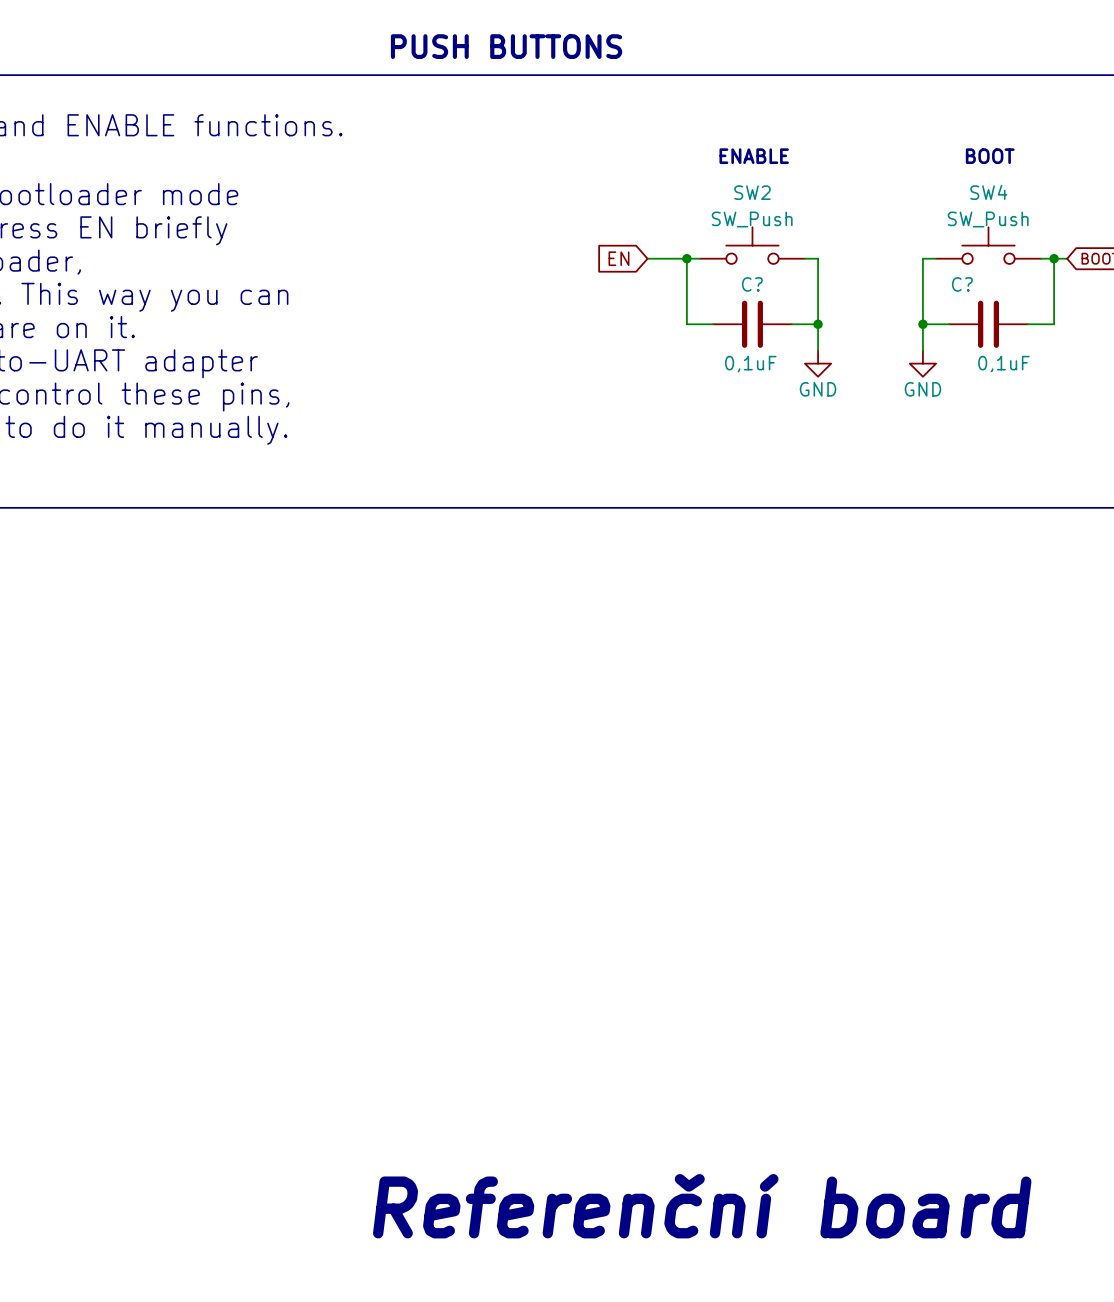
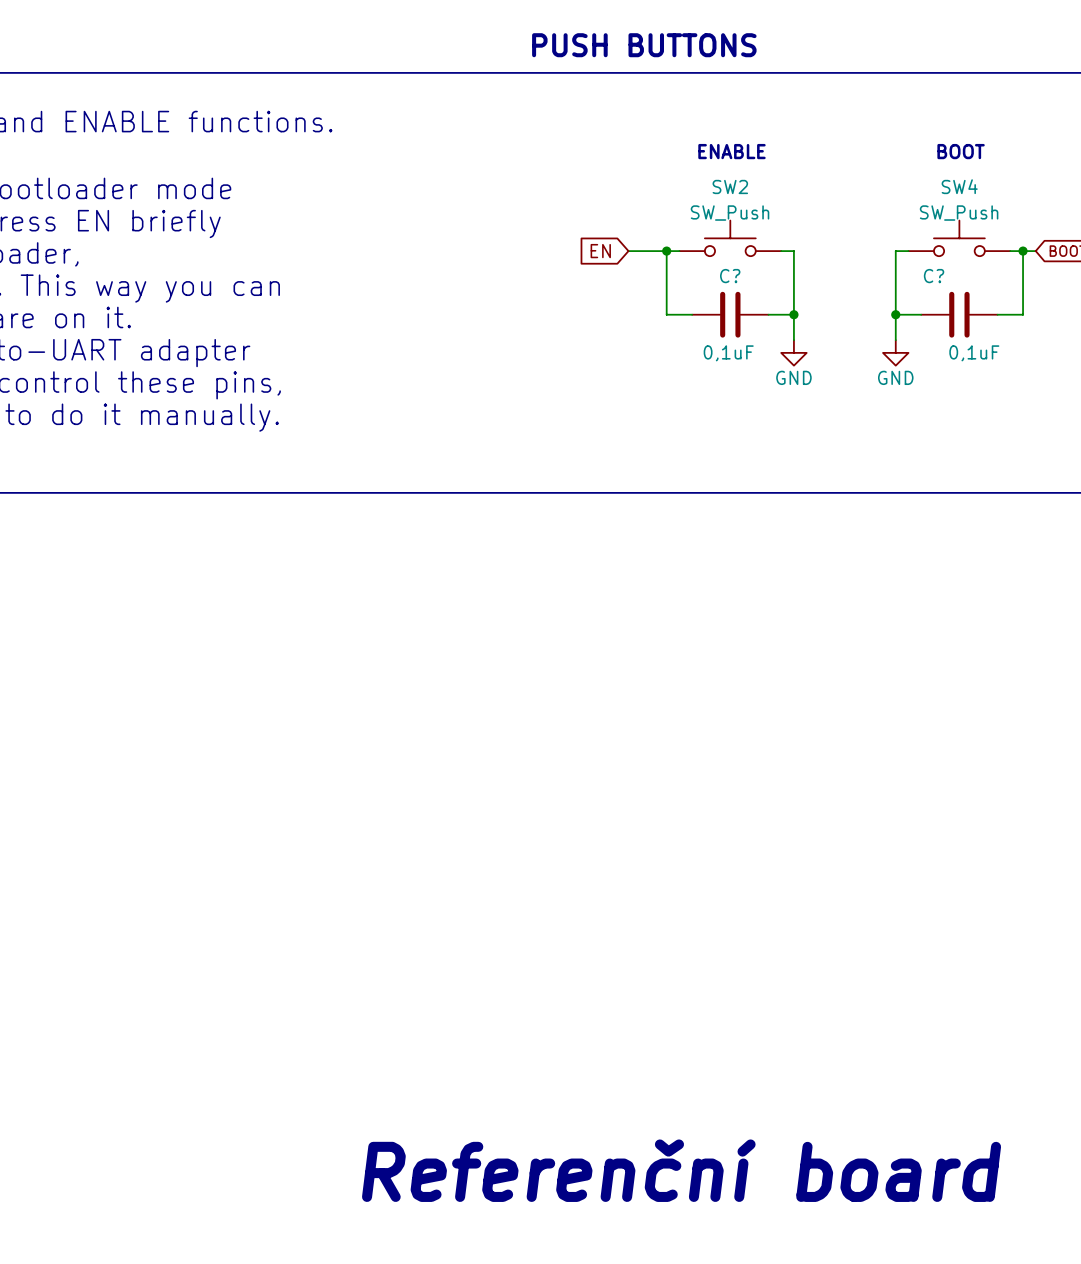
text position: PUSH BUTTONS (506, 46) -> PUSH BUTTONS (644, 45)

